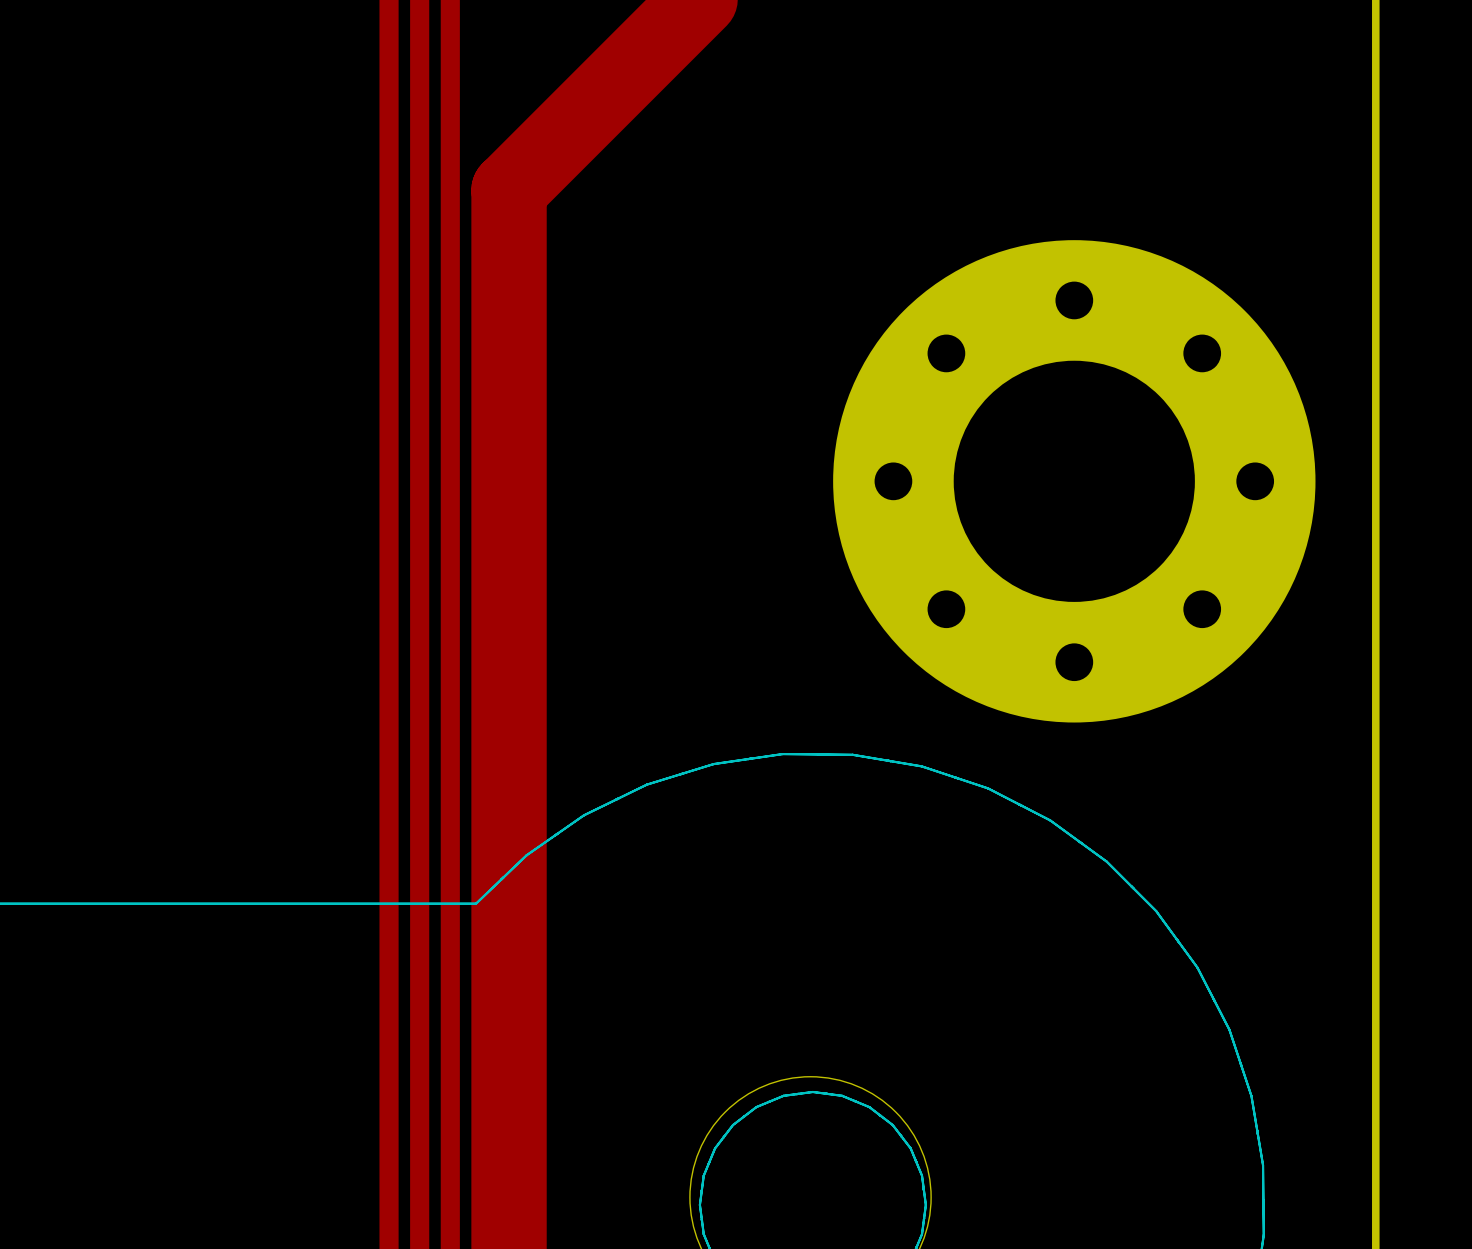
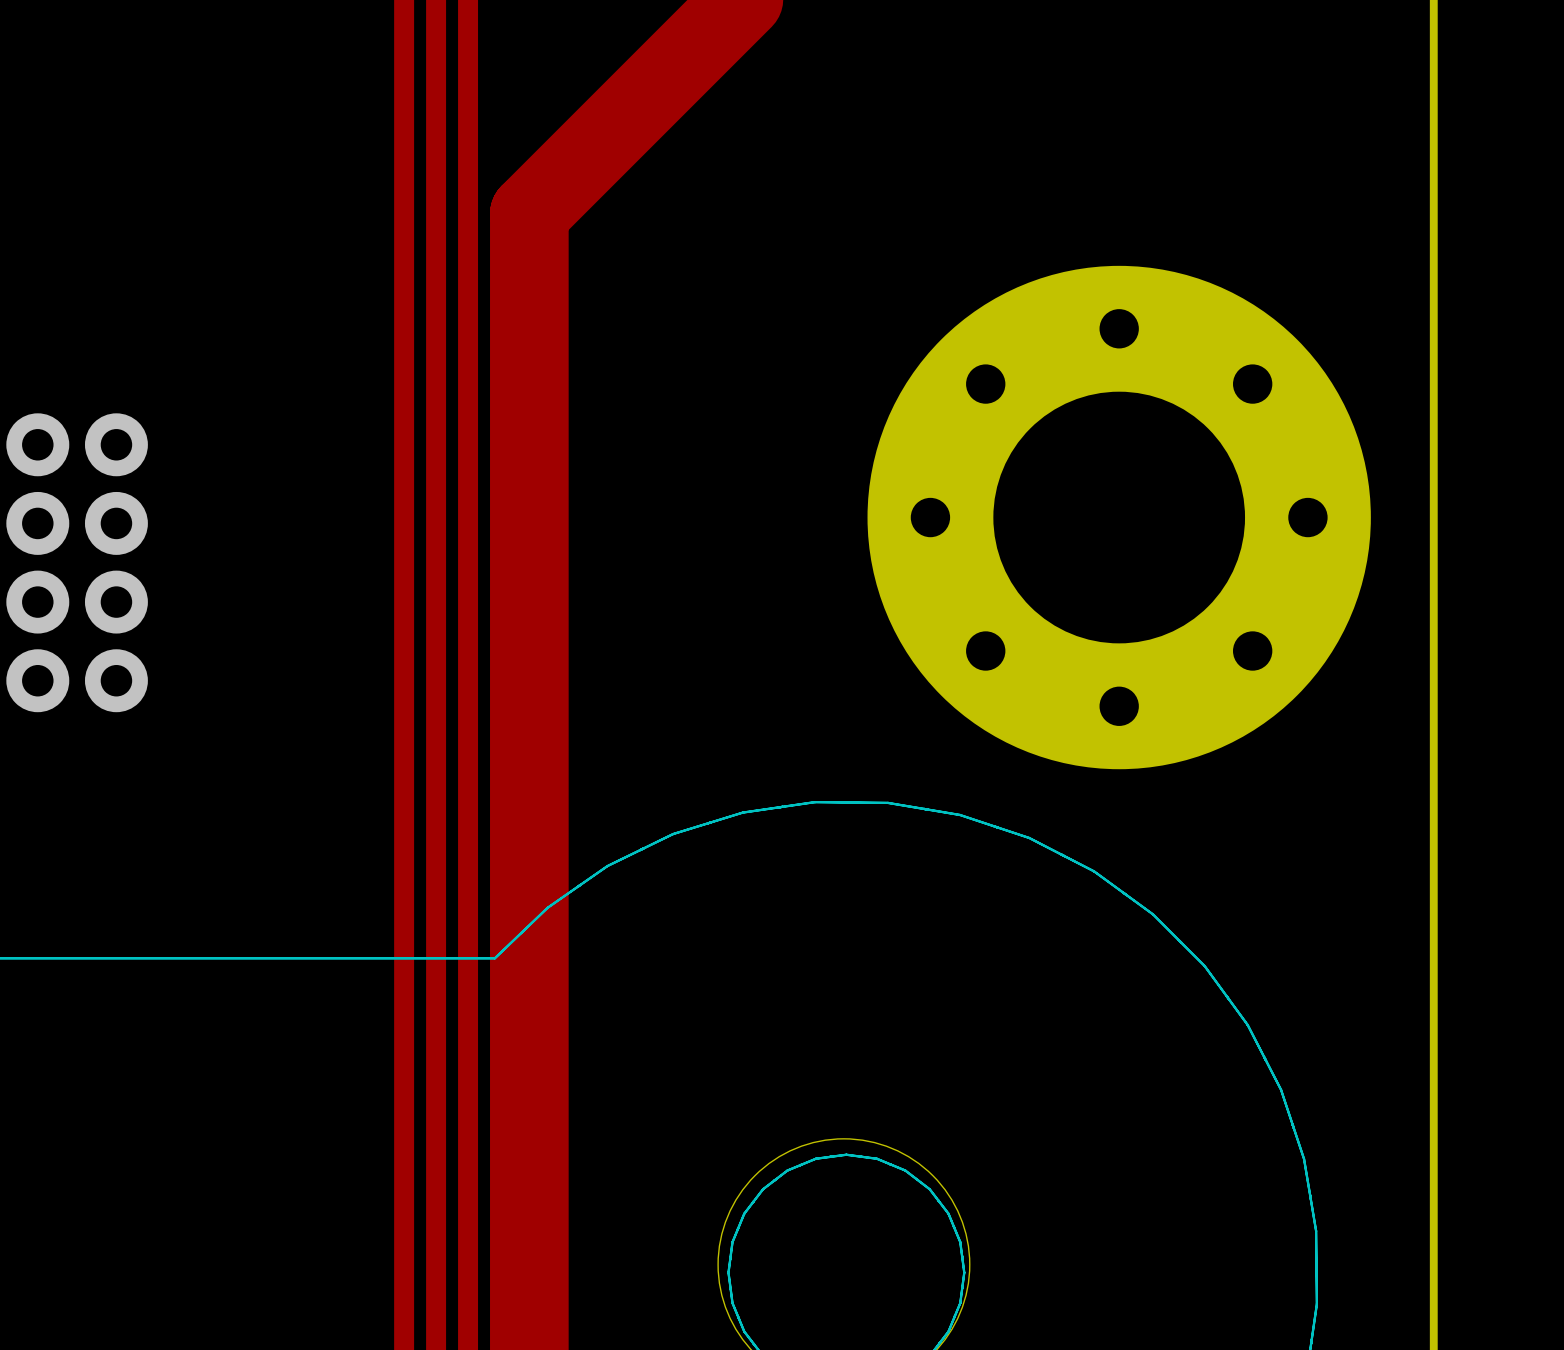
via: none -> (37, 444)
via: none -> (116, 444)
via: none -> (37, 523)
via: none -> (116, 523)
via: none -> (37, 602)
via: none -> (116, 602)
via: none -> (37, 680)
via: none -> (116, 680)

